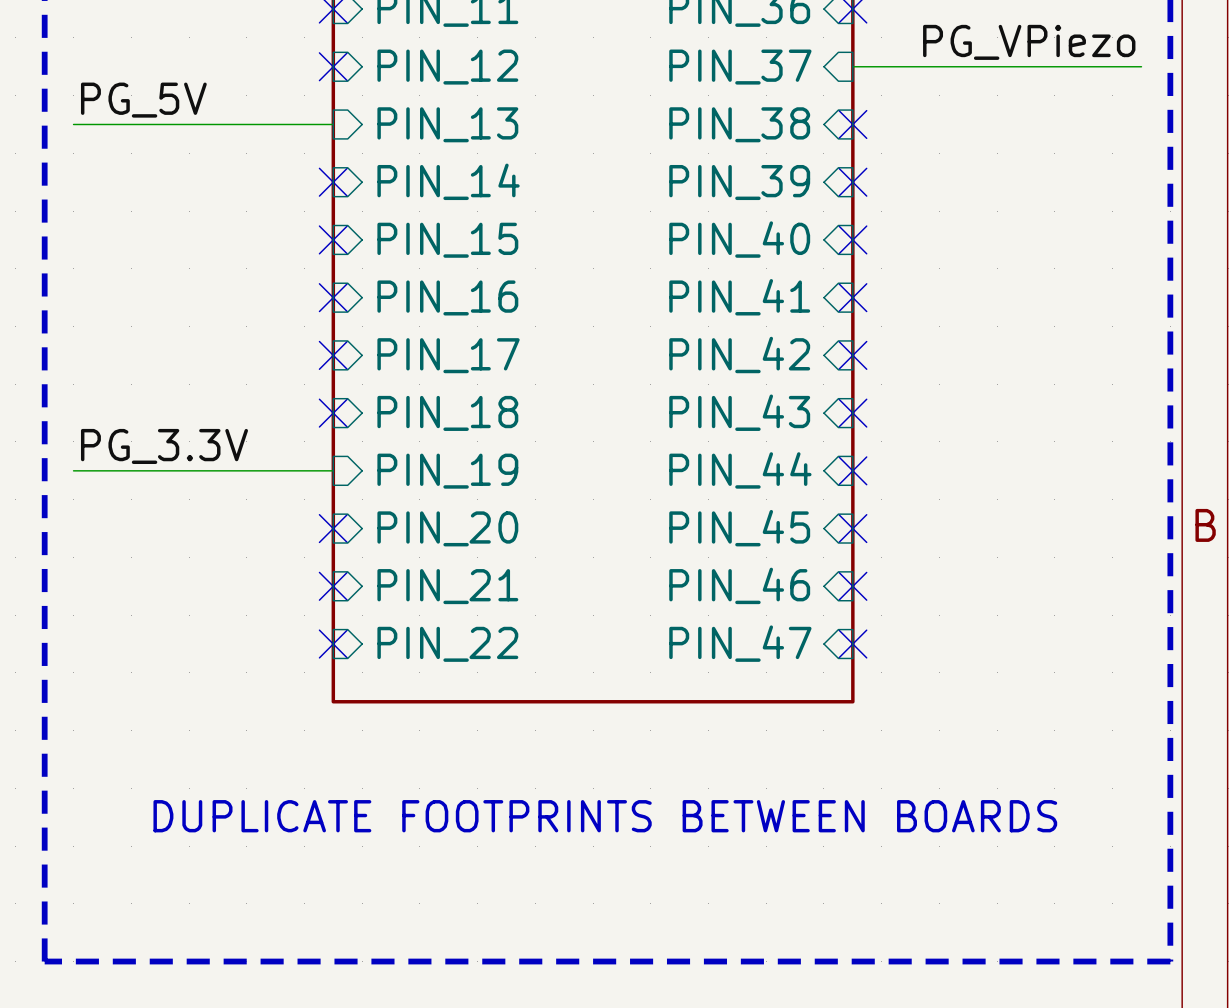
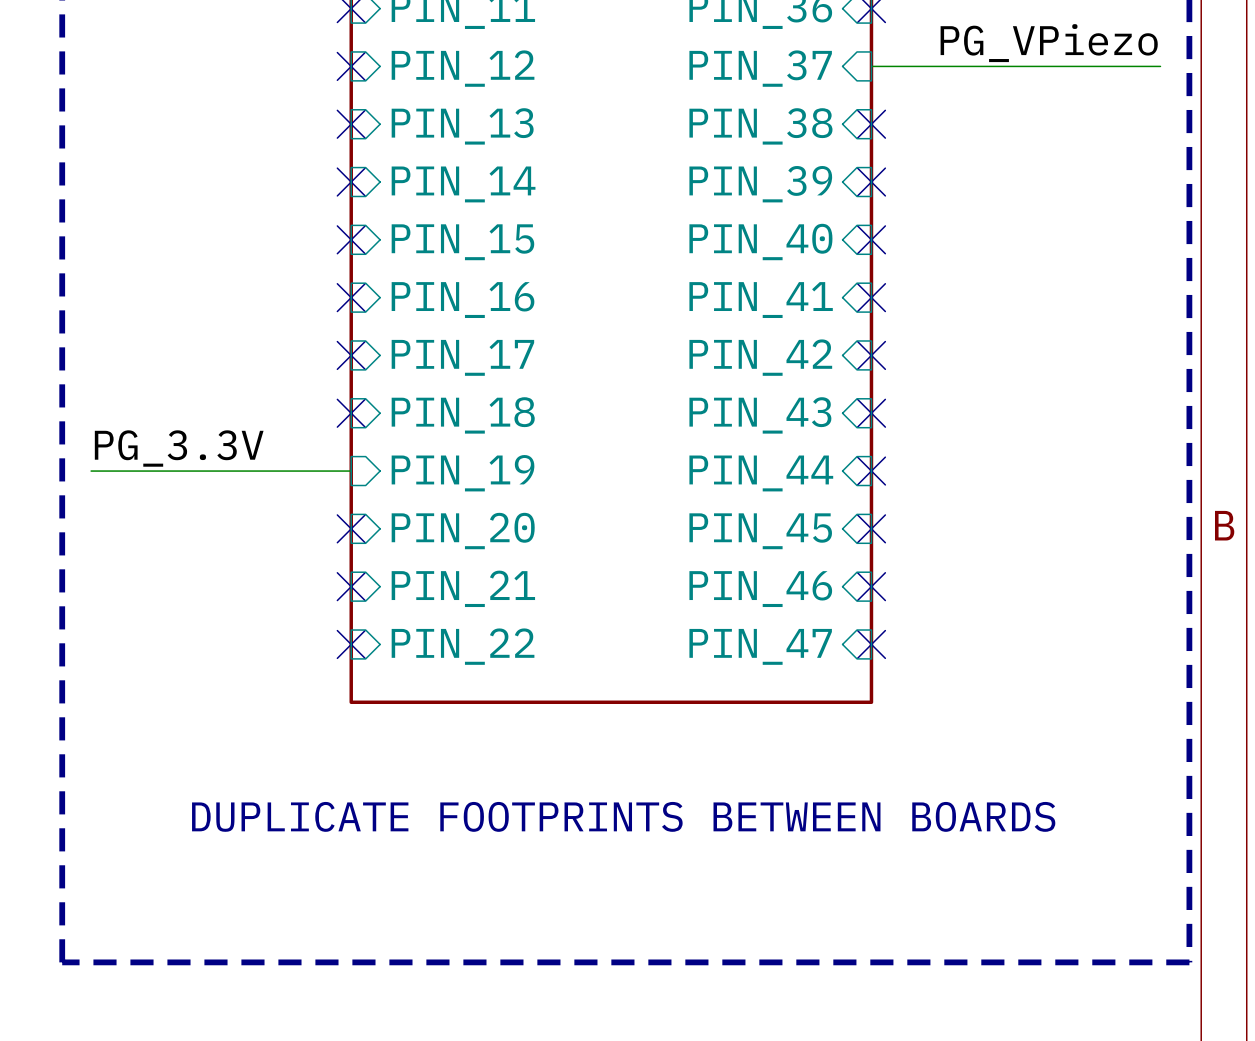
label: PG_5V (143, 100) -> none
wire: (73, 124) (333, 124) -> none
no-connect mark: none -> (351, 124)

